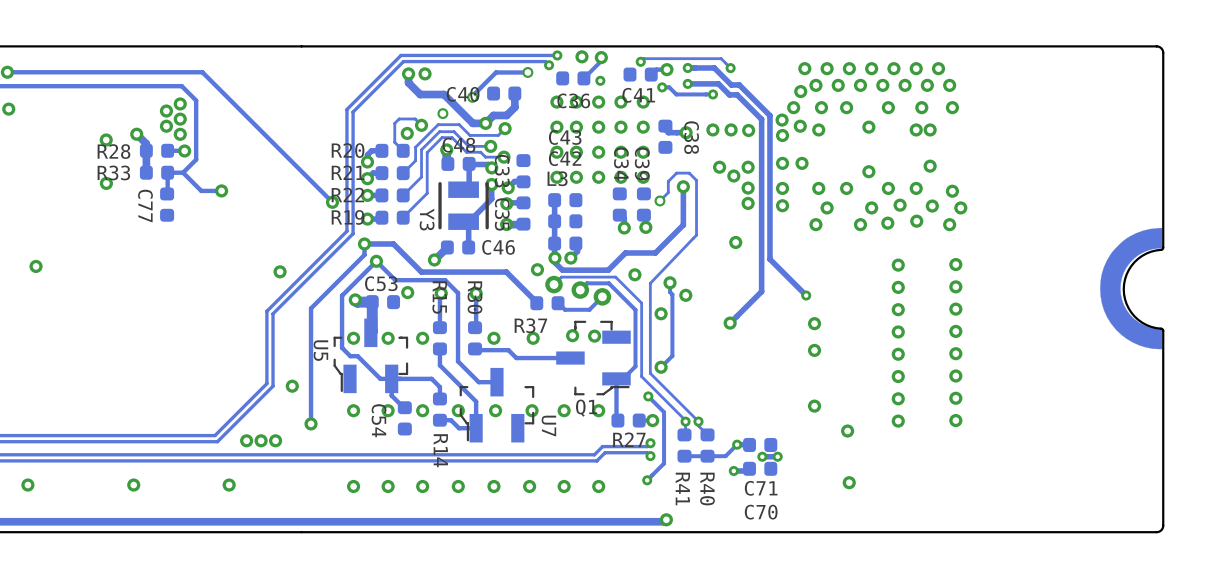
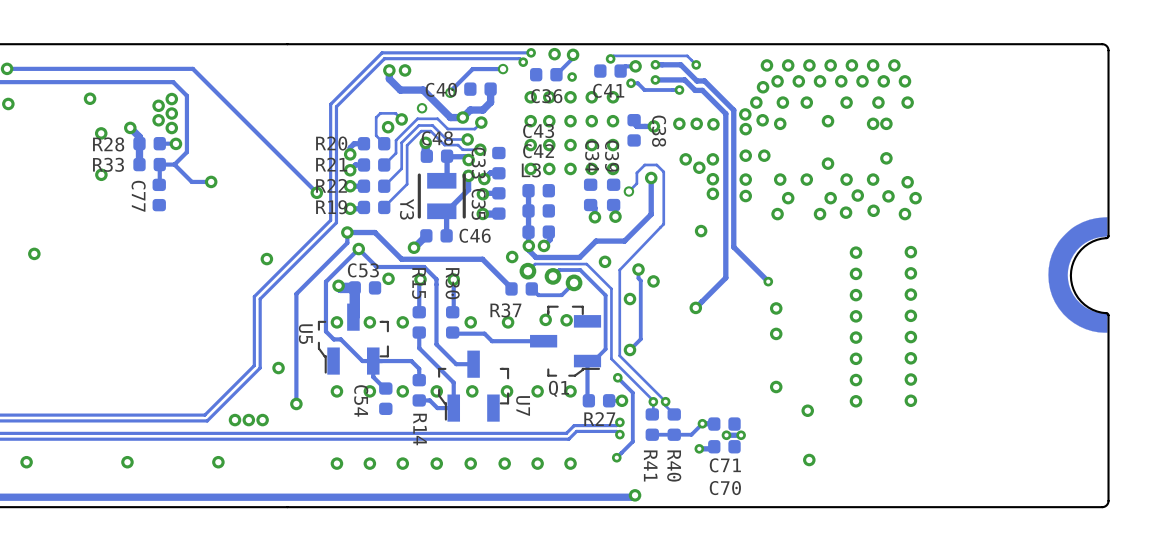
via: none -> (90, 98)

